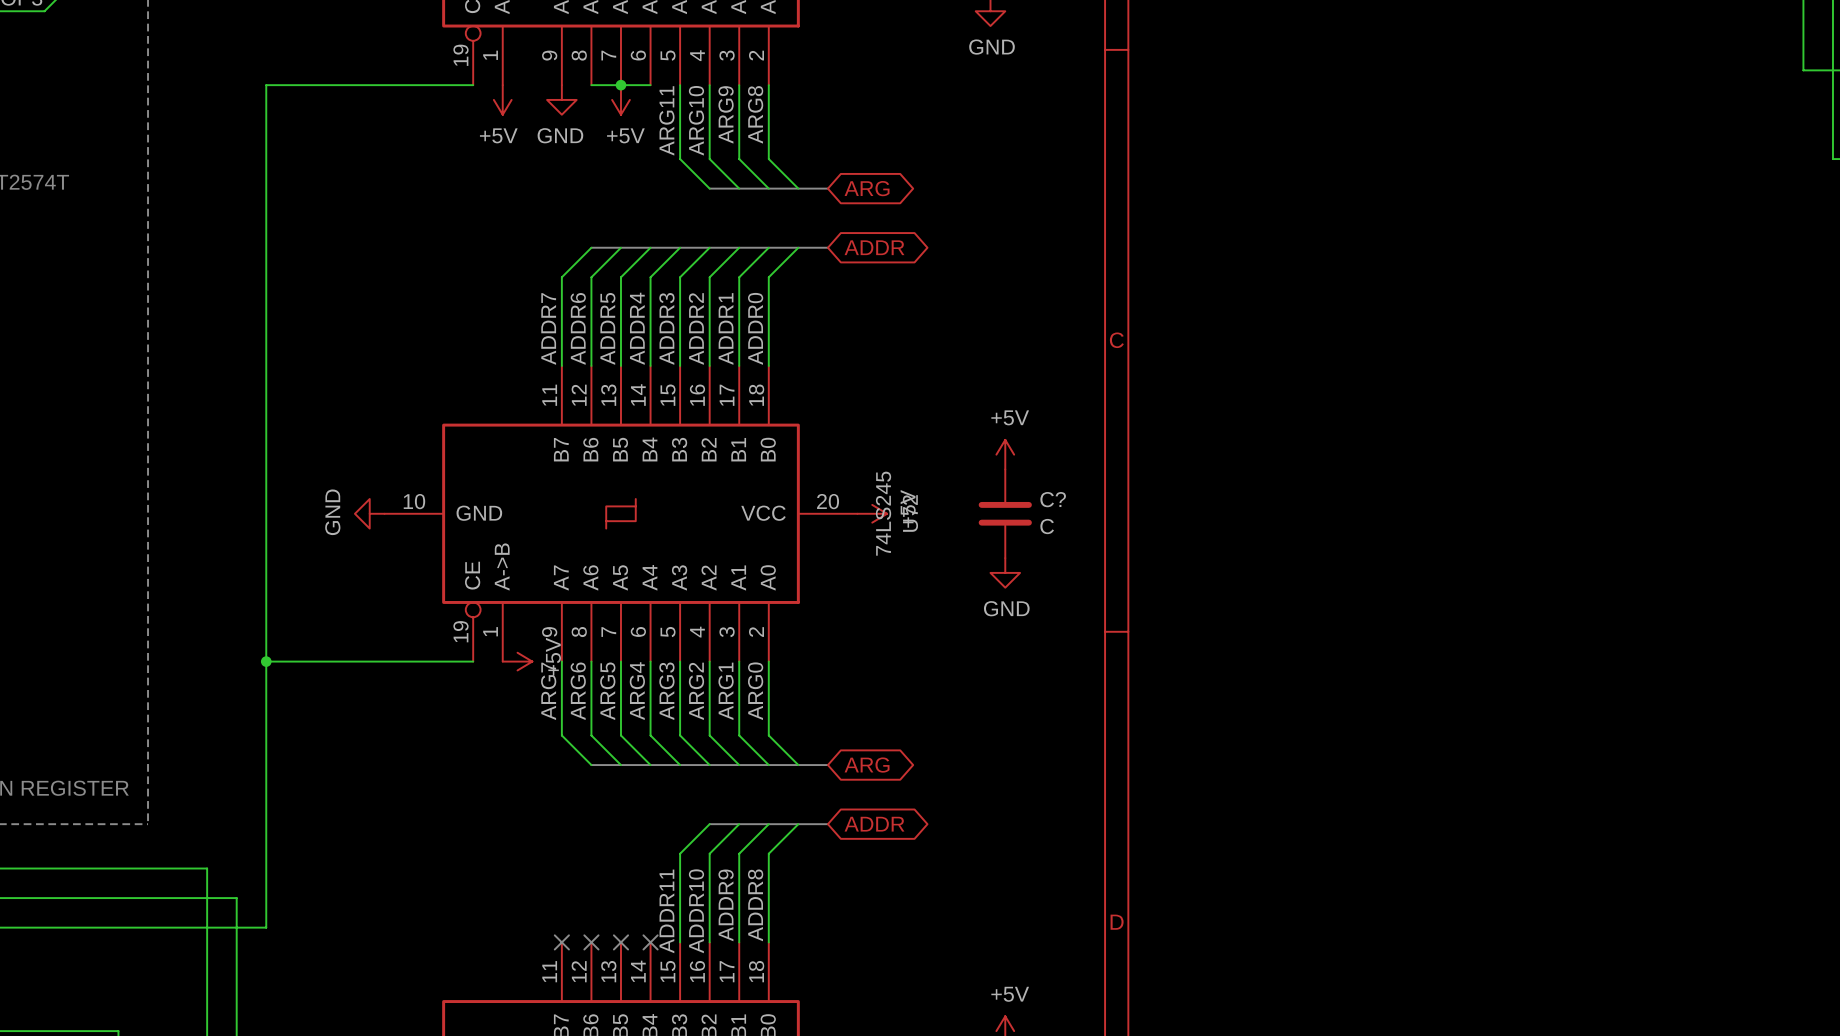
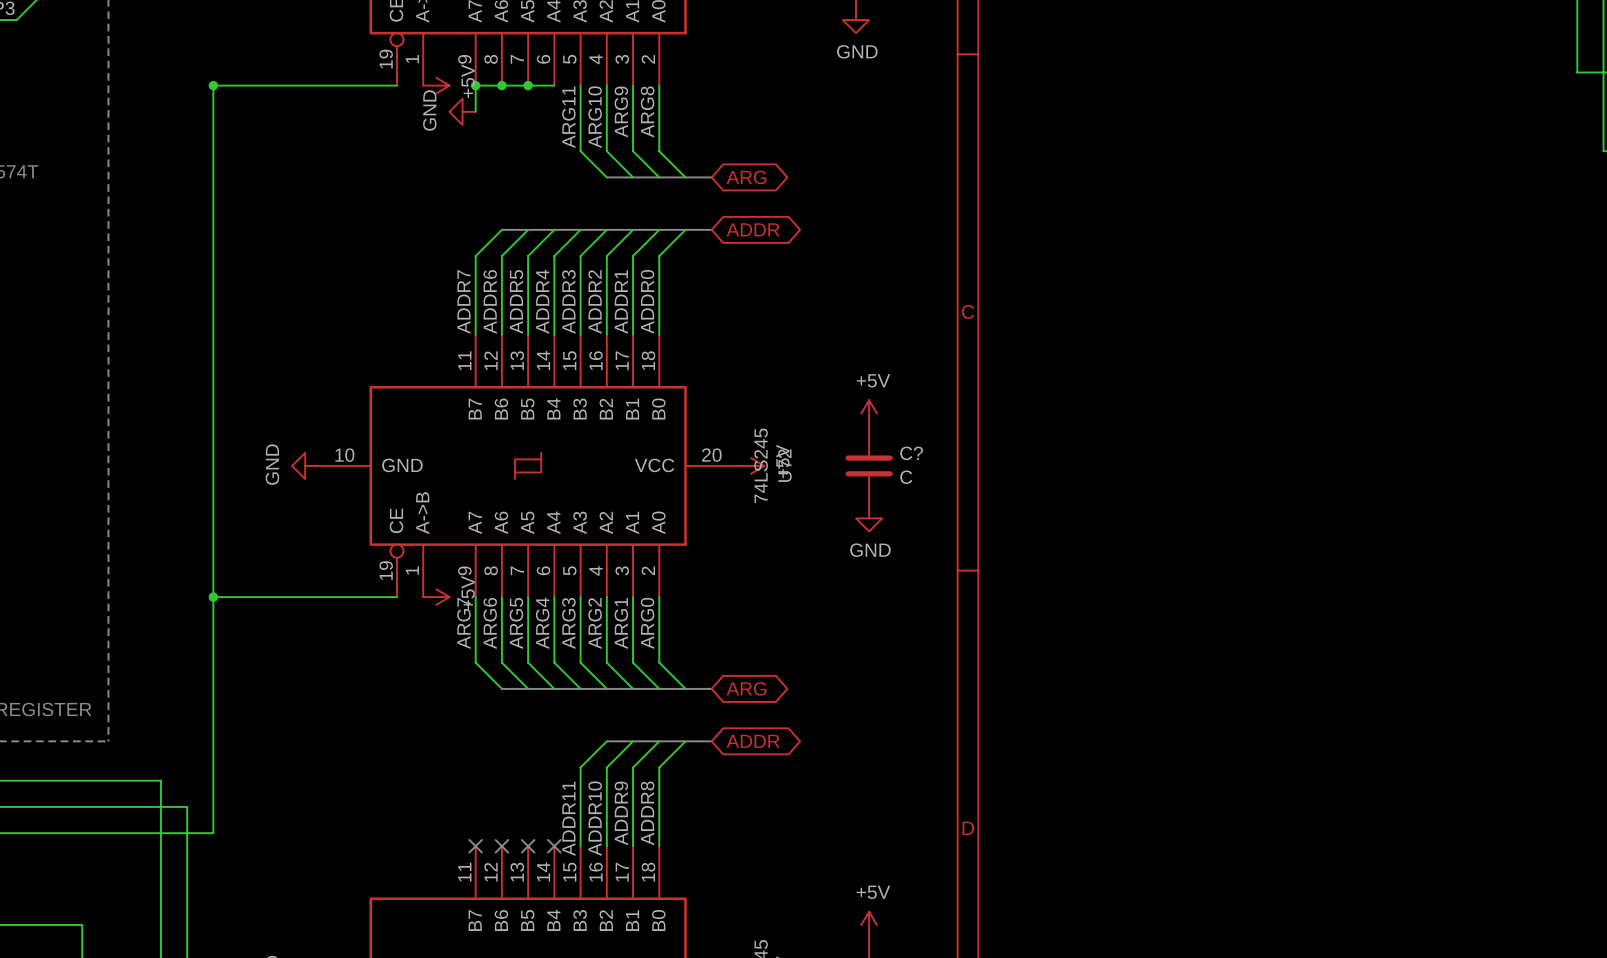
junction: none -> (213, 85)
junction: none -> (475, 85)
wire: none -> (501, 85) (475, 85) (475, 111)
junction: none -> (501, 85)
power symbol rotation: 0° (502, 99) -> 90° counterclockwise (436, 85)
power symbol position: +5V (502, 99) -> +5V (436, 85)
power symbol rotation: 0° (561, 99) -> 90° clockwise (462, 111)
power symbol position: GND (561, 99) -> GND (462, 111)
power symbol: +5V (620, 99) -> none

